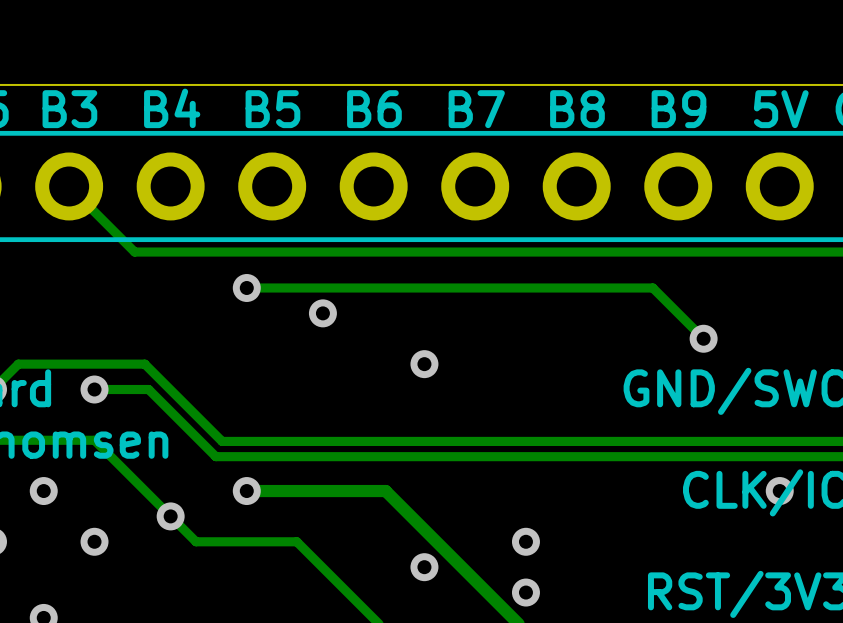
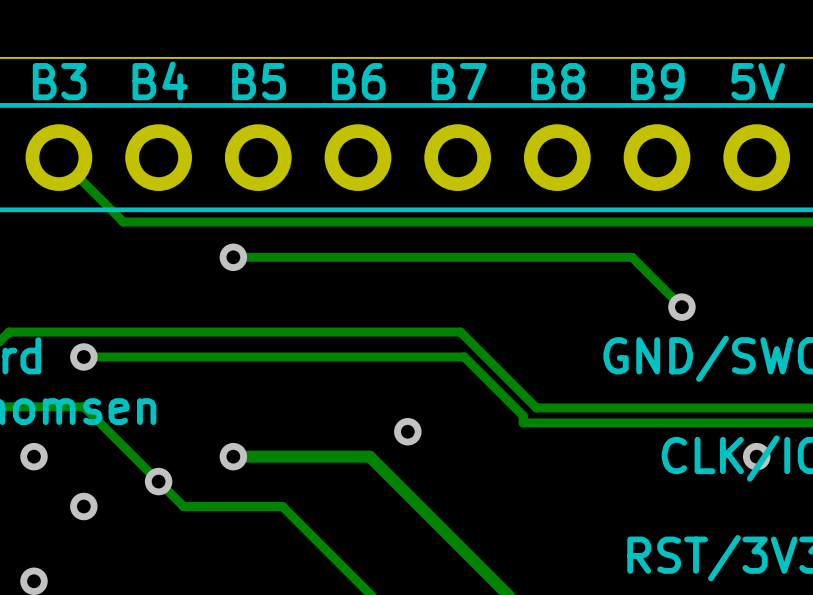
via: (322, 313) -> none
track: (144, 364) (222, 441) (555, 441) -> (133, 332) (460, 332) (536, 407)
via: (424, 364) -> none
track: (148, 389) (215, 456) (541, 456) -> (137, 356) (464, 356) (523, 415) (523, 422)
via: none -> (407, 431)
via: (525, 541) -> none
via: (424, 567) -> none
via: (525, 592) -> none

